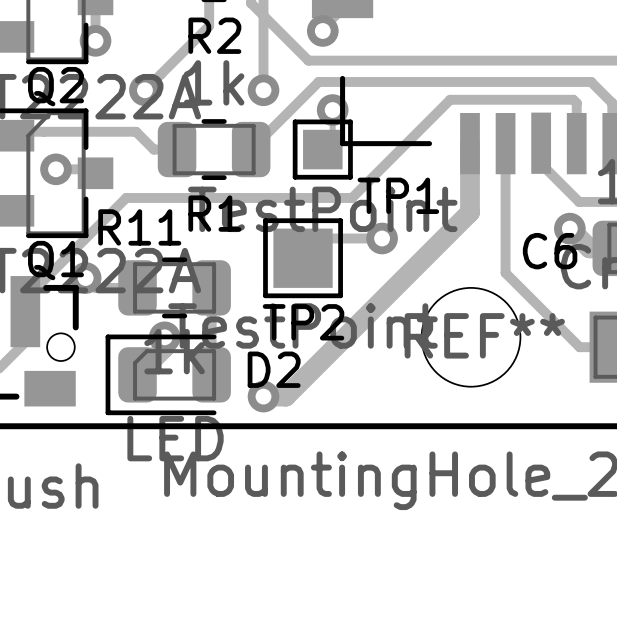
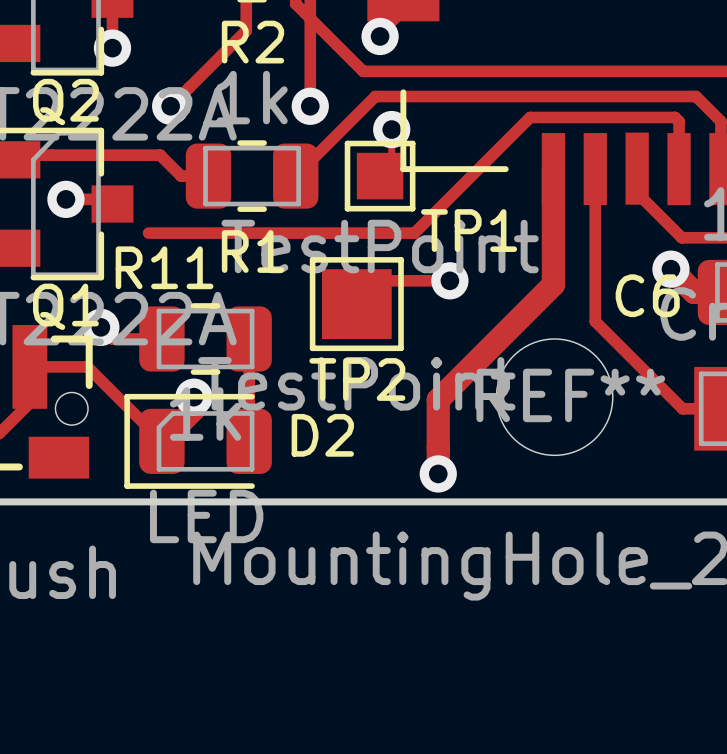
track: (126, 197) (25, 298) (25, 311) -> (161, 441) (87, 366) (29, 366)
track: (469, 212) (285, 396) (263, 396) -> (553, 250) (553, 284) (438, 399) (438, 473)
via position: (263, 396) -> (438, 473)

